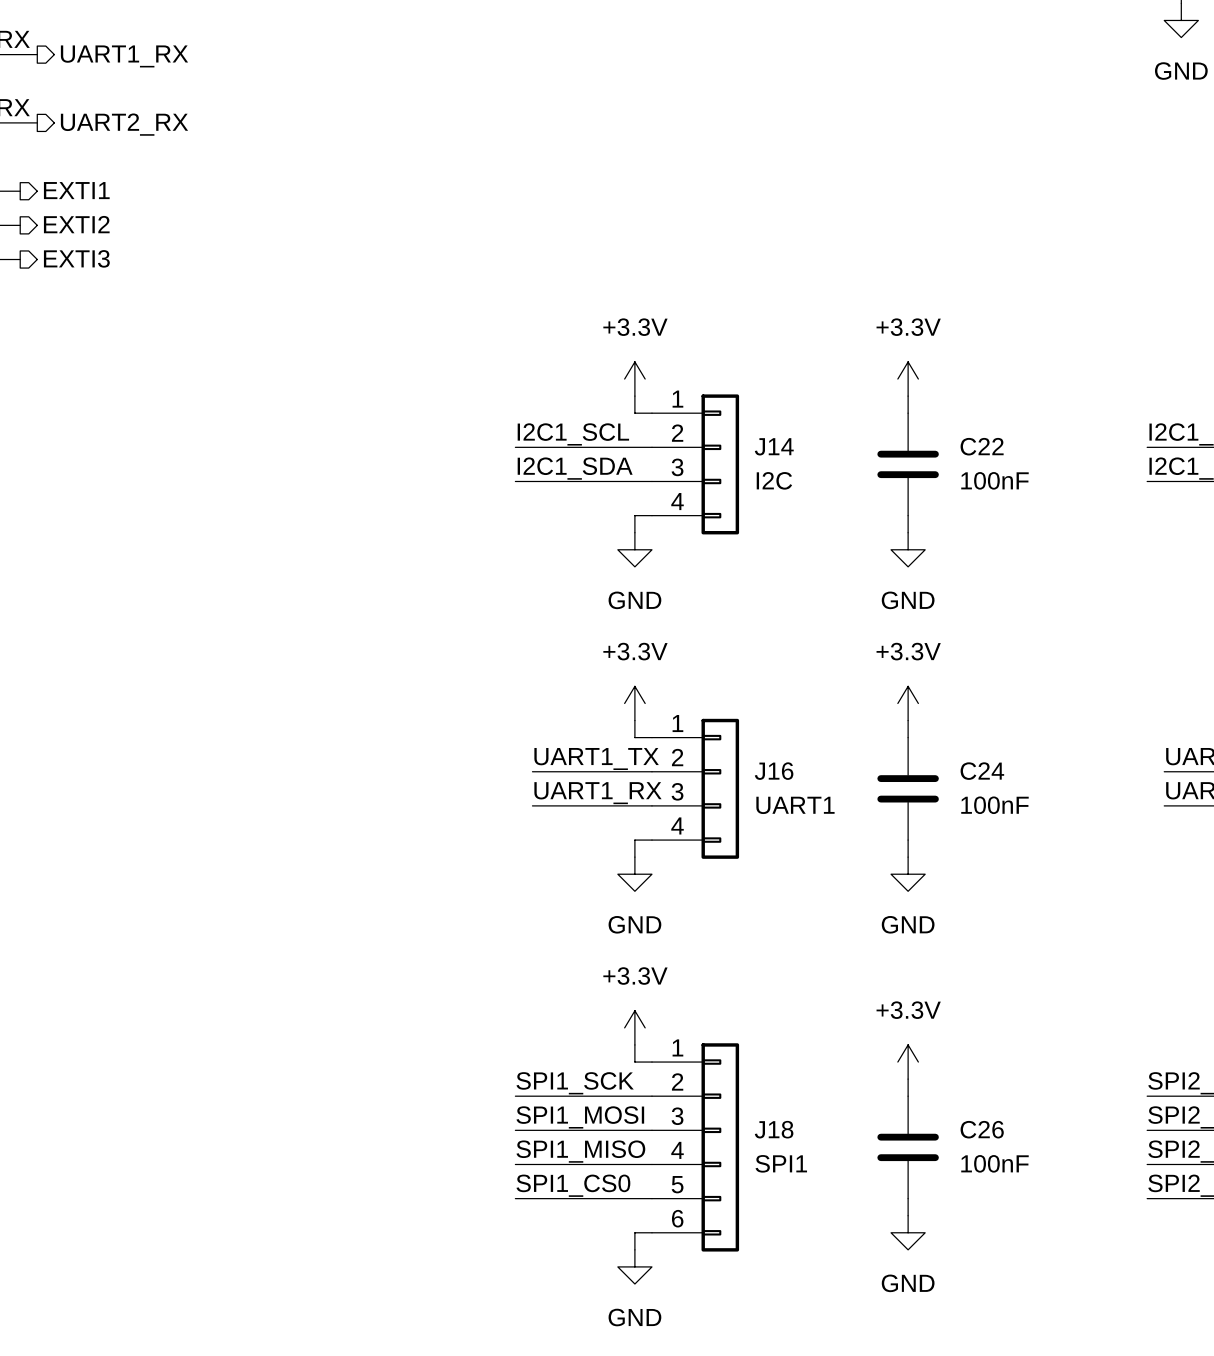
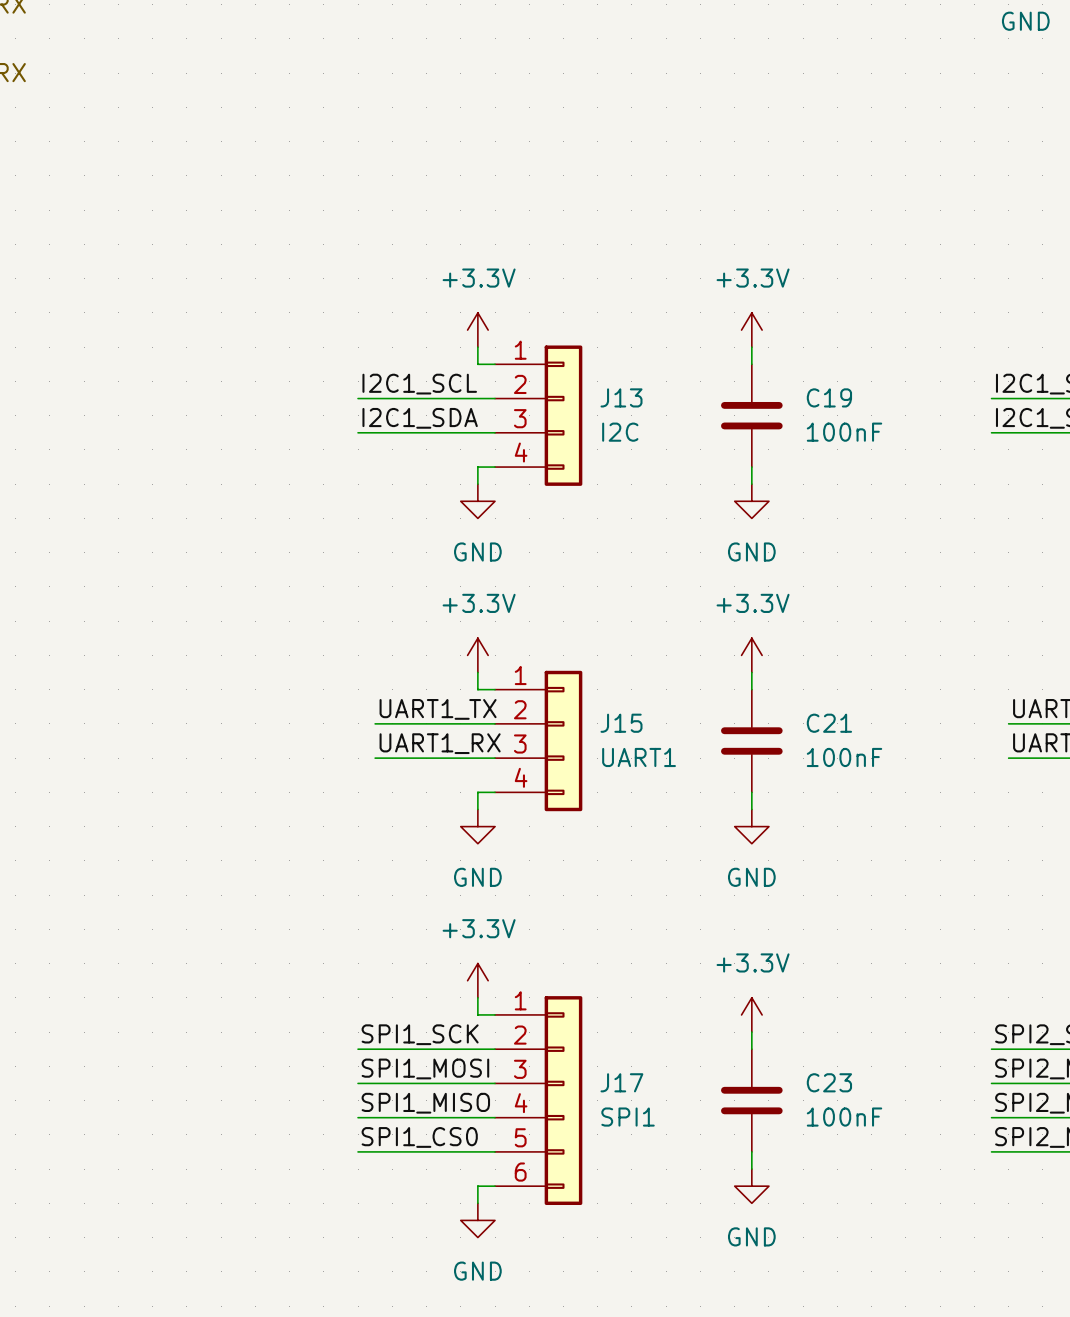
J14 name: J14 (774, 446) -> J13 (621, 397)
C22 name: C22 (982, 446) -> C19 (829, 397)
J16 name: J16 (774, 771) -> J15 (621, 723)
C24 name: C24 (982, 771) -> C21 (829, 723)
J18 name: J18 (774, 1129) -> J17 (621, 1082)
C26 name: C26 (982, 1129) -> C23 (829, 1082)

